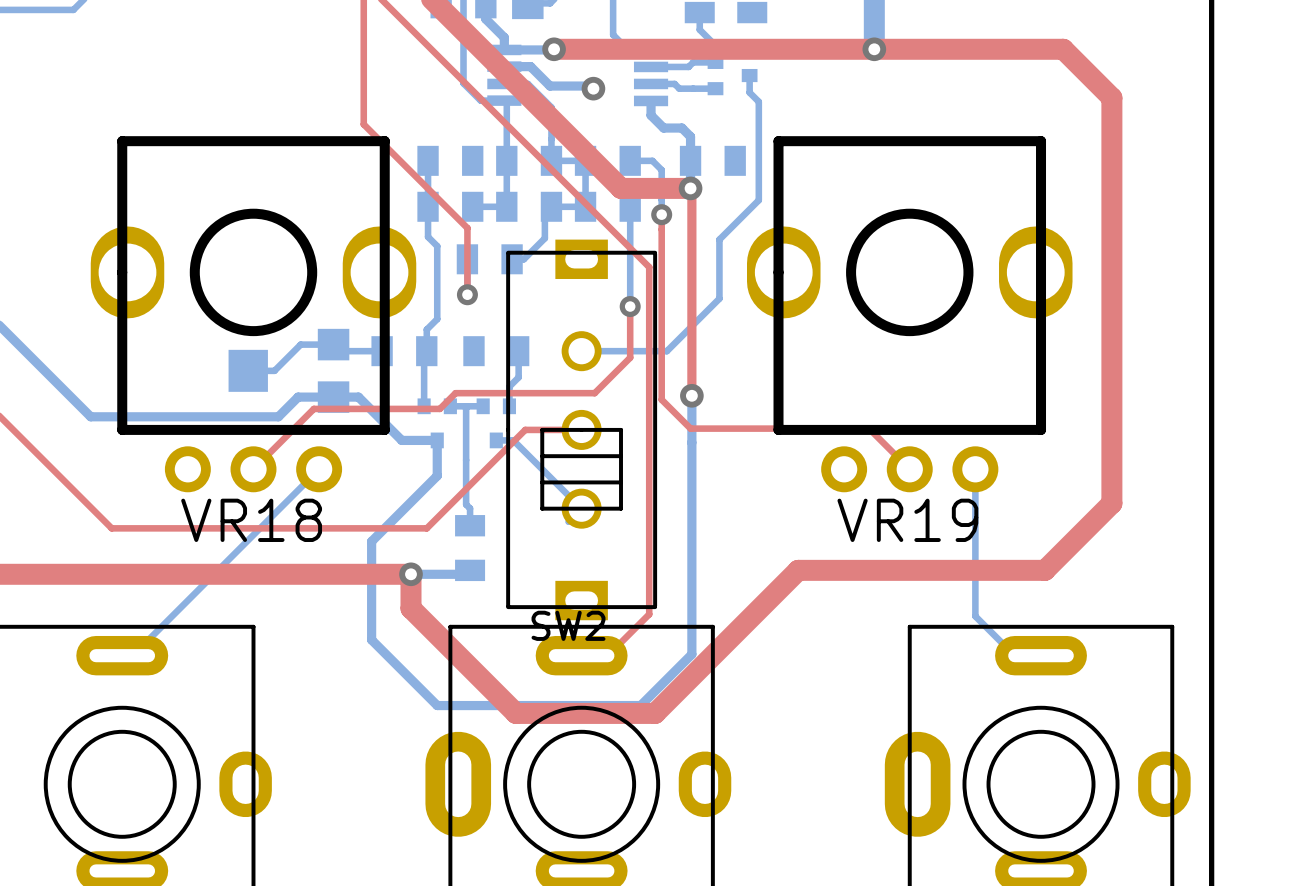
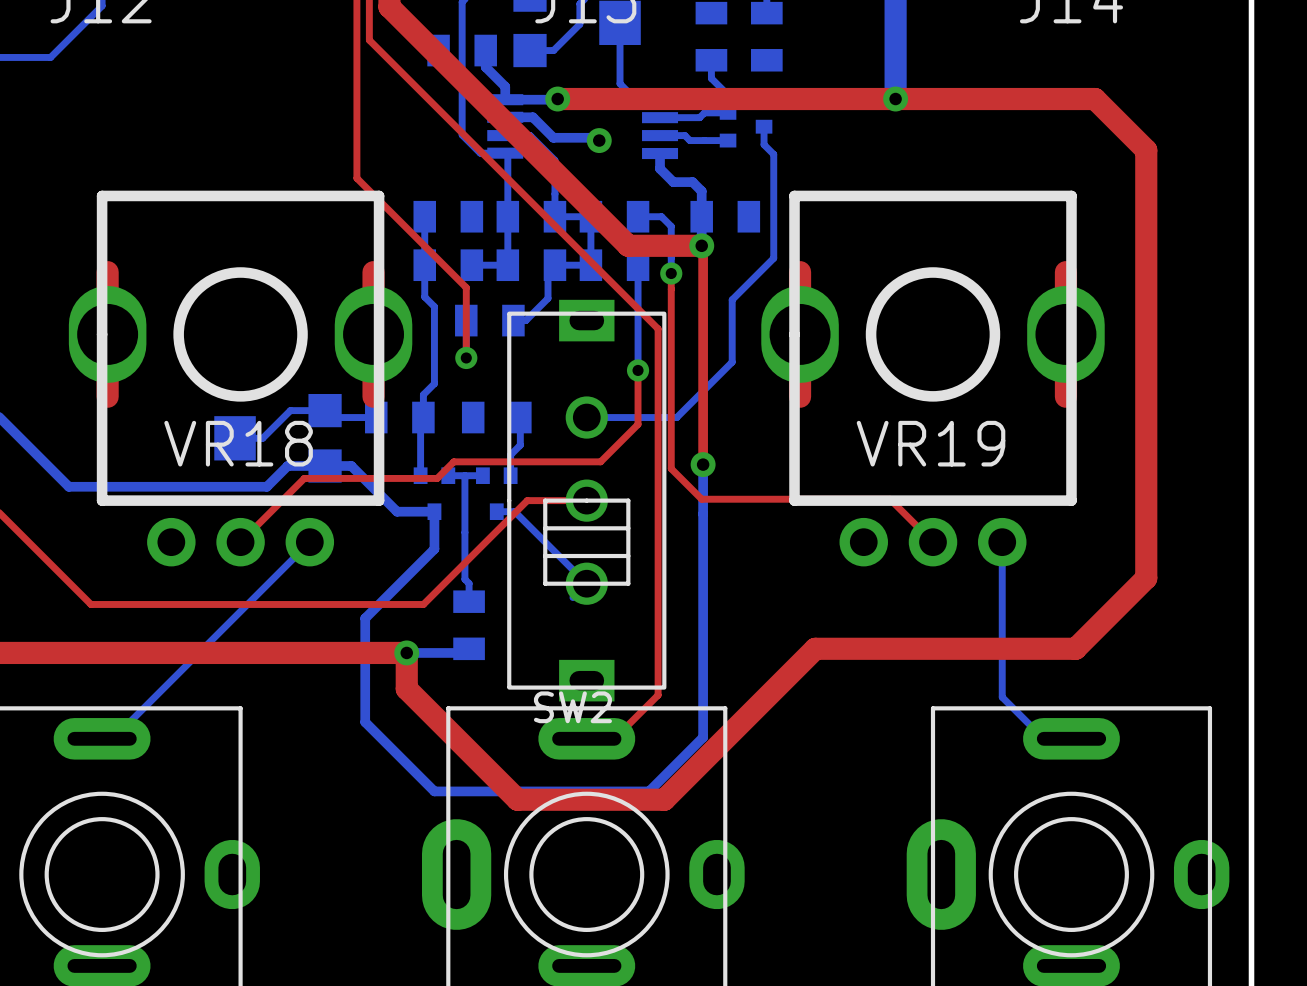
VR18 footprint: [90, 136, 417, 493] -> [68, 190, 413, 567]
VR19 footprint: [747, 136, 1073, 493] -> [761, 190, 1105, 567]
VR18 name position: VR18 (251, 520) -> VR18 (238, 443)
VR19 name position: VR19 (907, 520) -> VR19 (931, 443)

